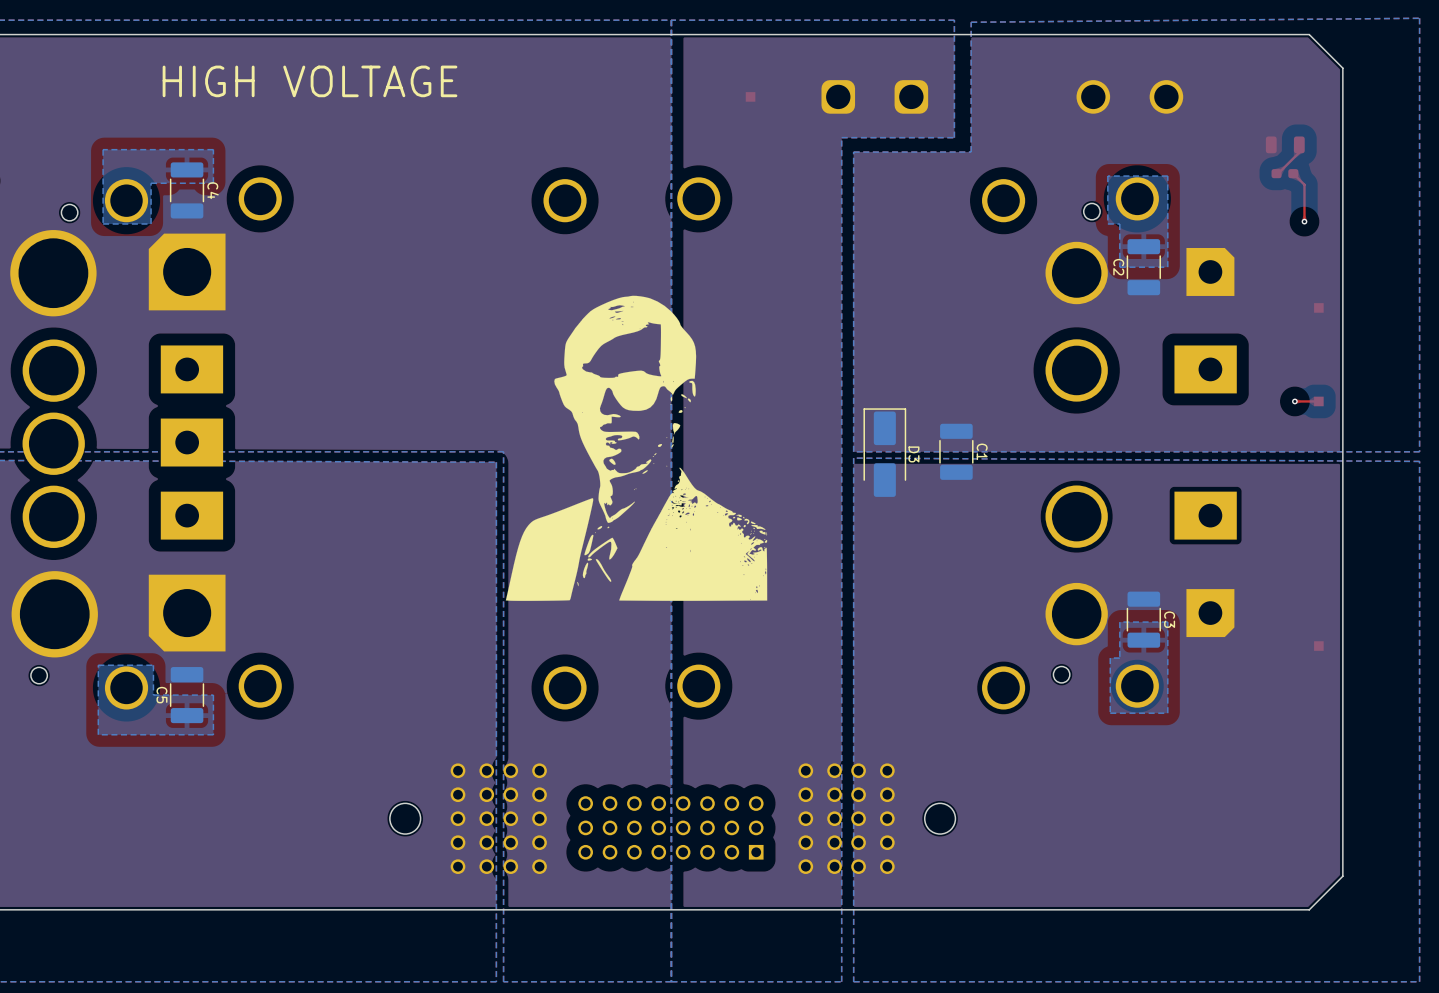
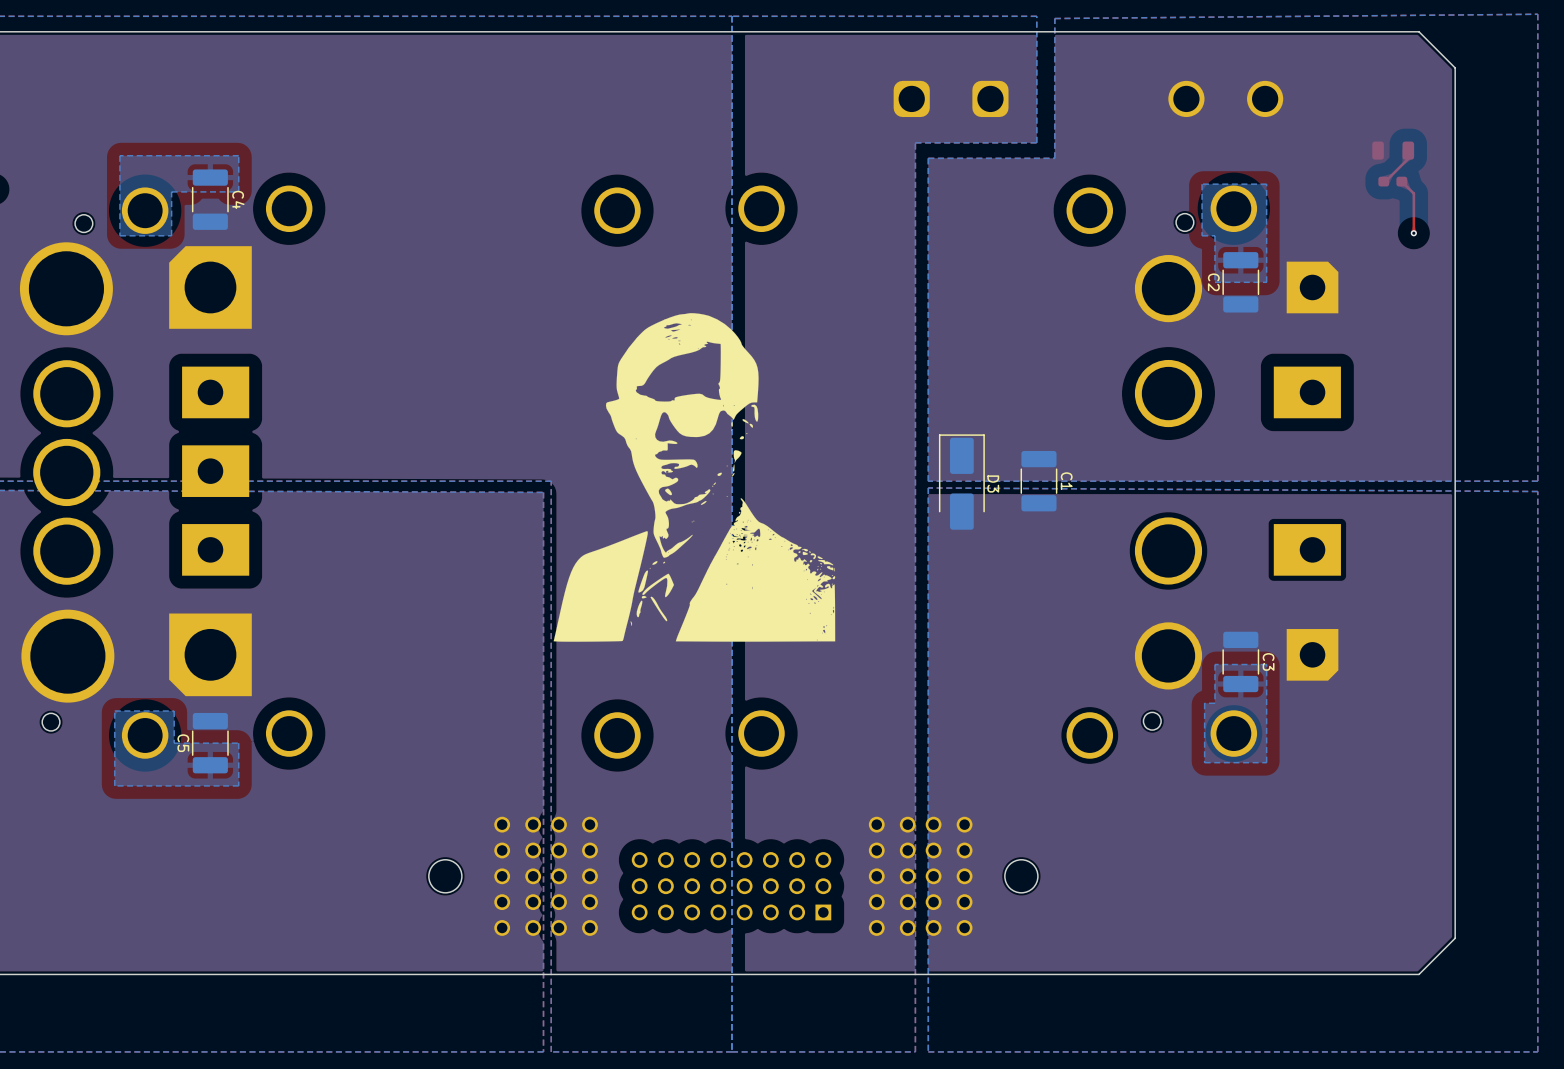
text: HIGH VOLTAGE (310, 81) -> none
part: (750, 96) -> none
part: (1318, 307) -> none
via: (1294, 401) -> none
top track: (1318, 401) (1294, 401) -> none
part: (1318, 401) -> none
part: (1318, 646) -> none

